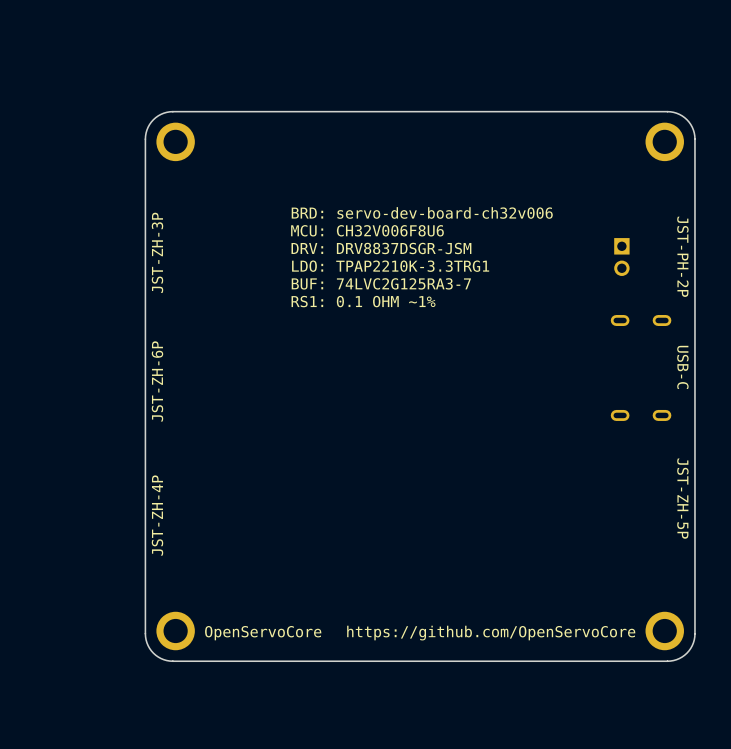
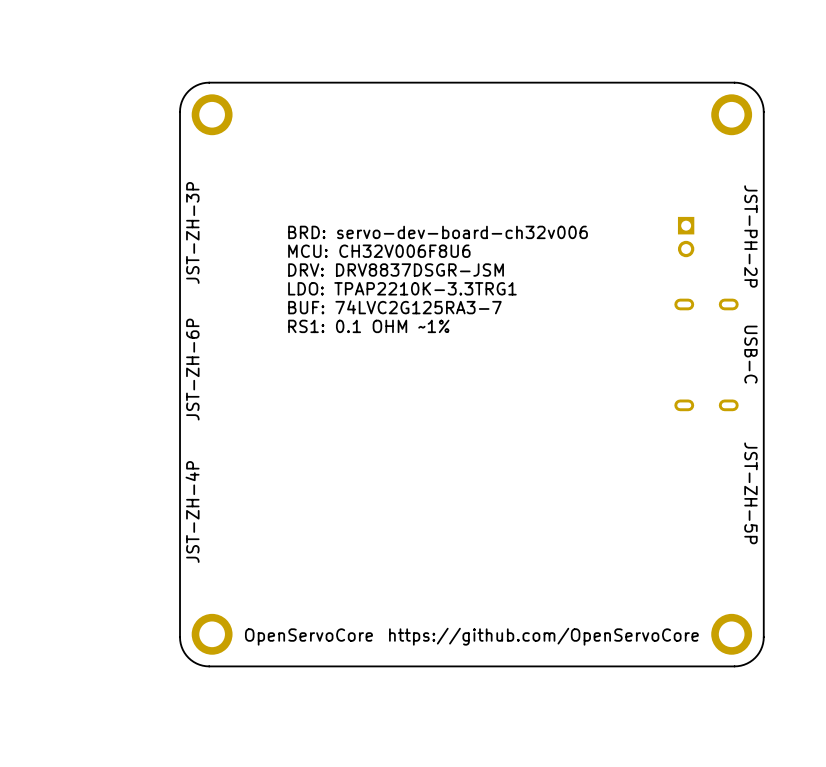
text position: BRD: servo-dev-board-ch32v006 (422, 212) -> BRD: servo-dev-board-ch32v006 (438, 232)
text position: MCU: CH32V006F8U6 (367, 230) -> MCU: CH32V006F8U6 (379, 251)
text position: DRV: DRV8837DSGR-JSM (381, 248) -> DRV: DRV8837DSGR-JSM (396, 270)
text position: LDO: TPAP2210K-3.3TRG1 (390, 266) -> LDO: TPAP2210K-3.3TRG1 (402, 288)
text position: BUF: 74LVC2G125RA3-7 (381, 283) -> BUF: 74LVC2G125RA3-7 (394, 307)
text position: RS1: 0.1 OHM ~1% (363, 301) -> RS1: 0.1 OHM ~1% (368, 326)

